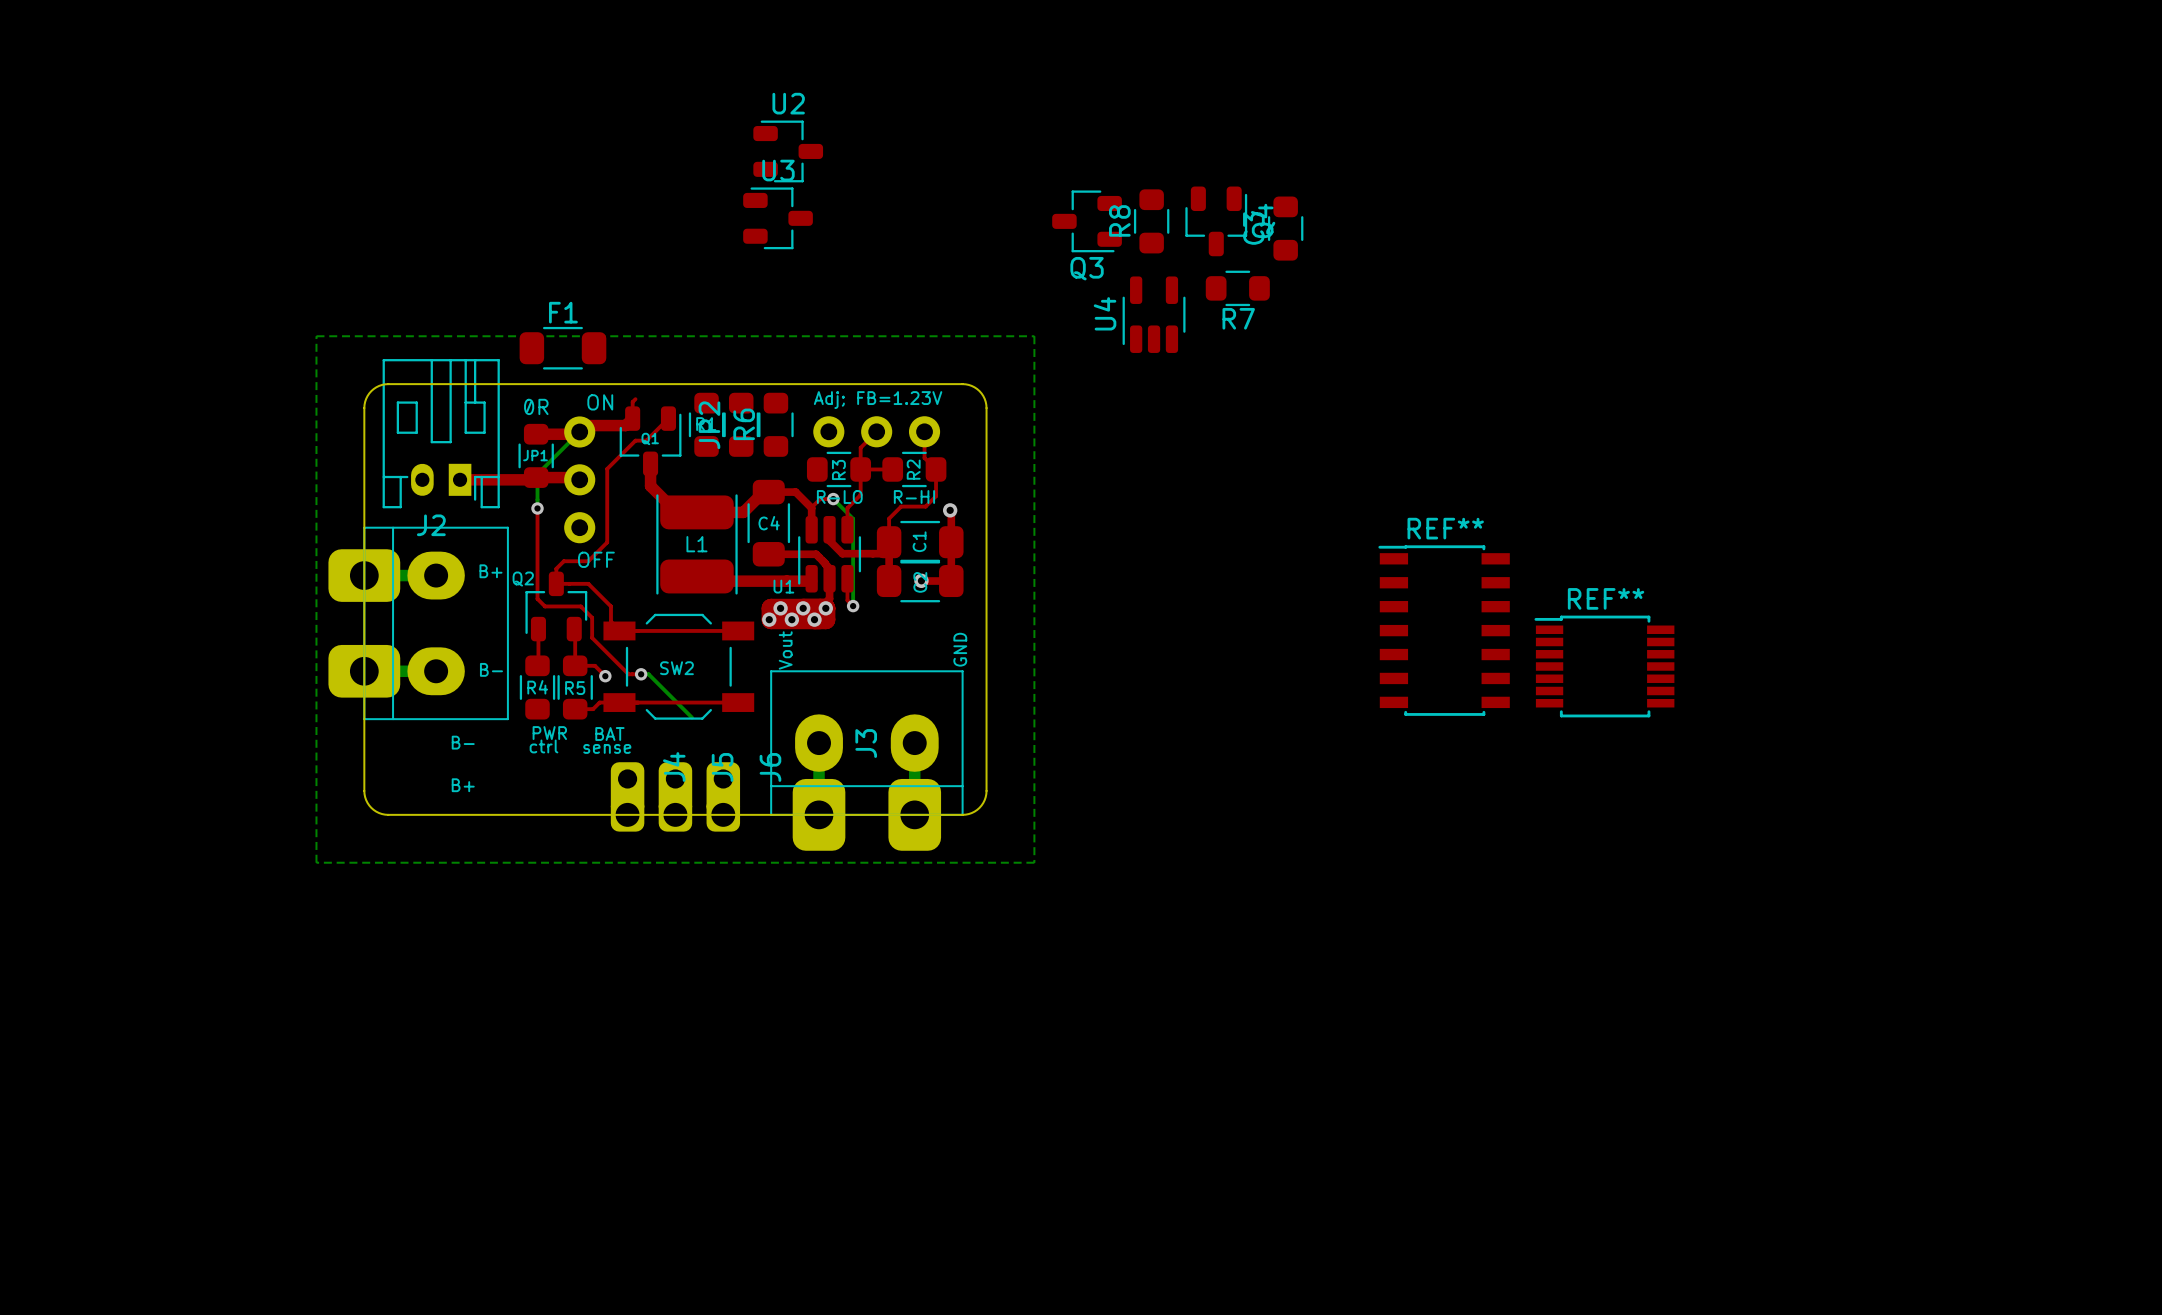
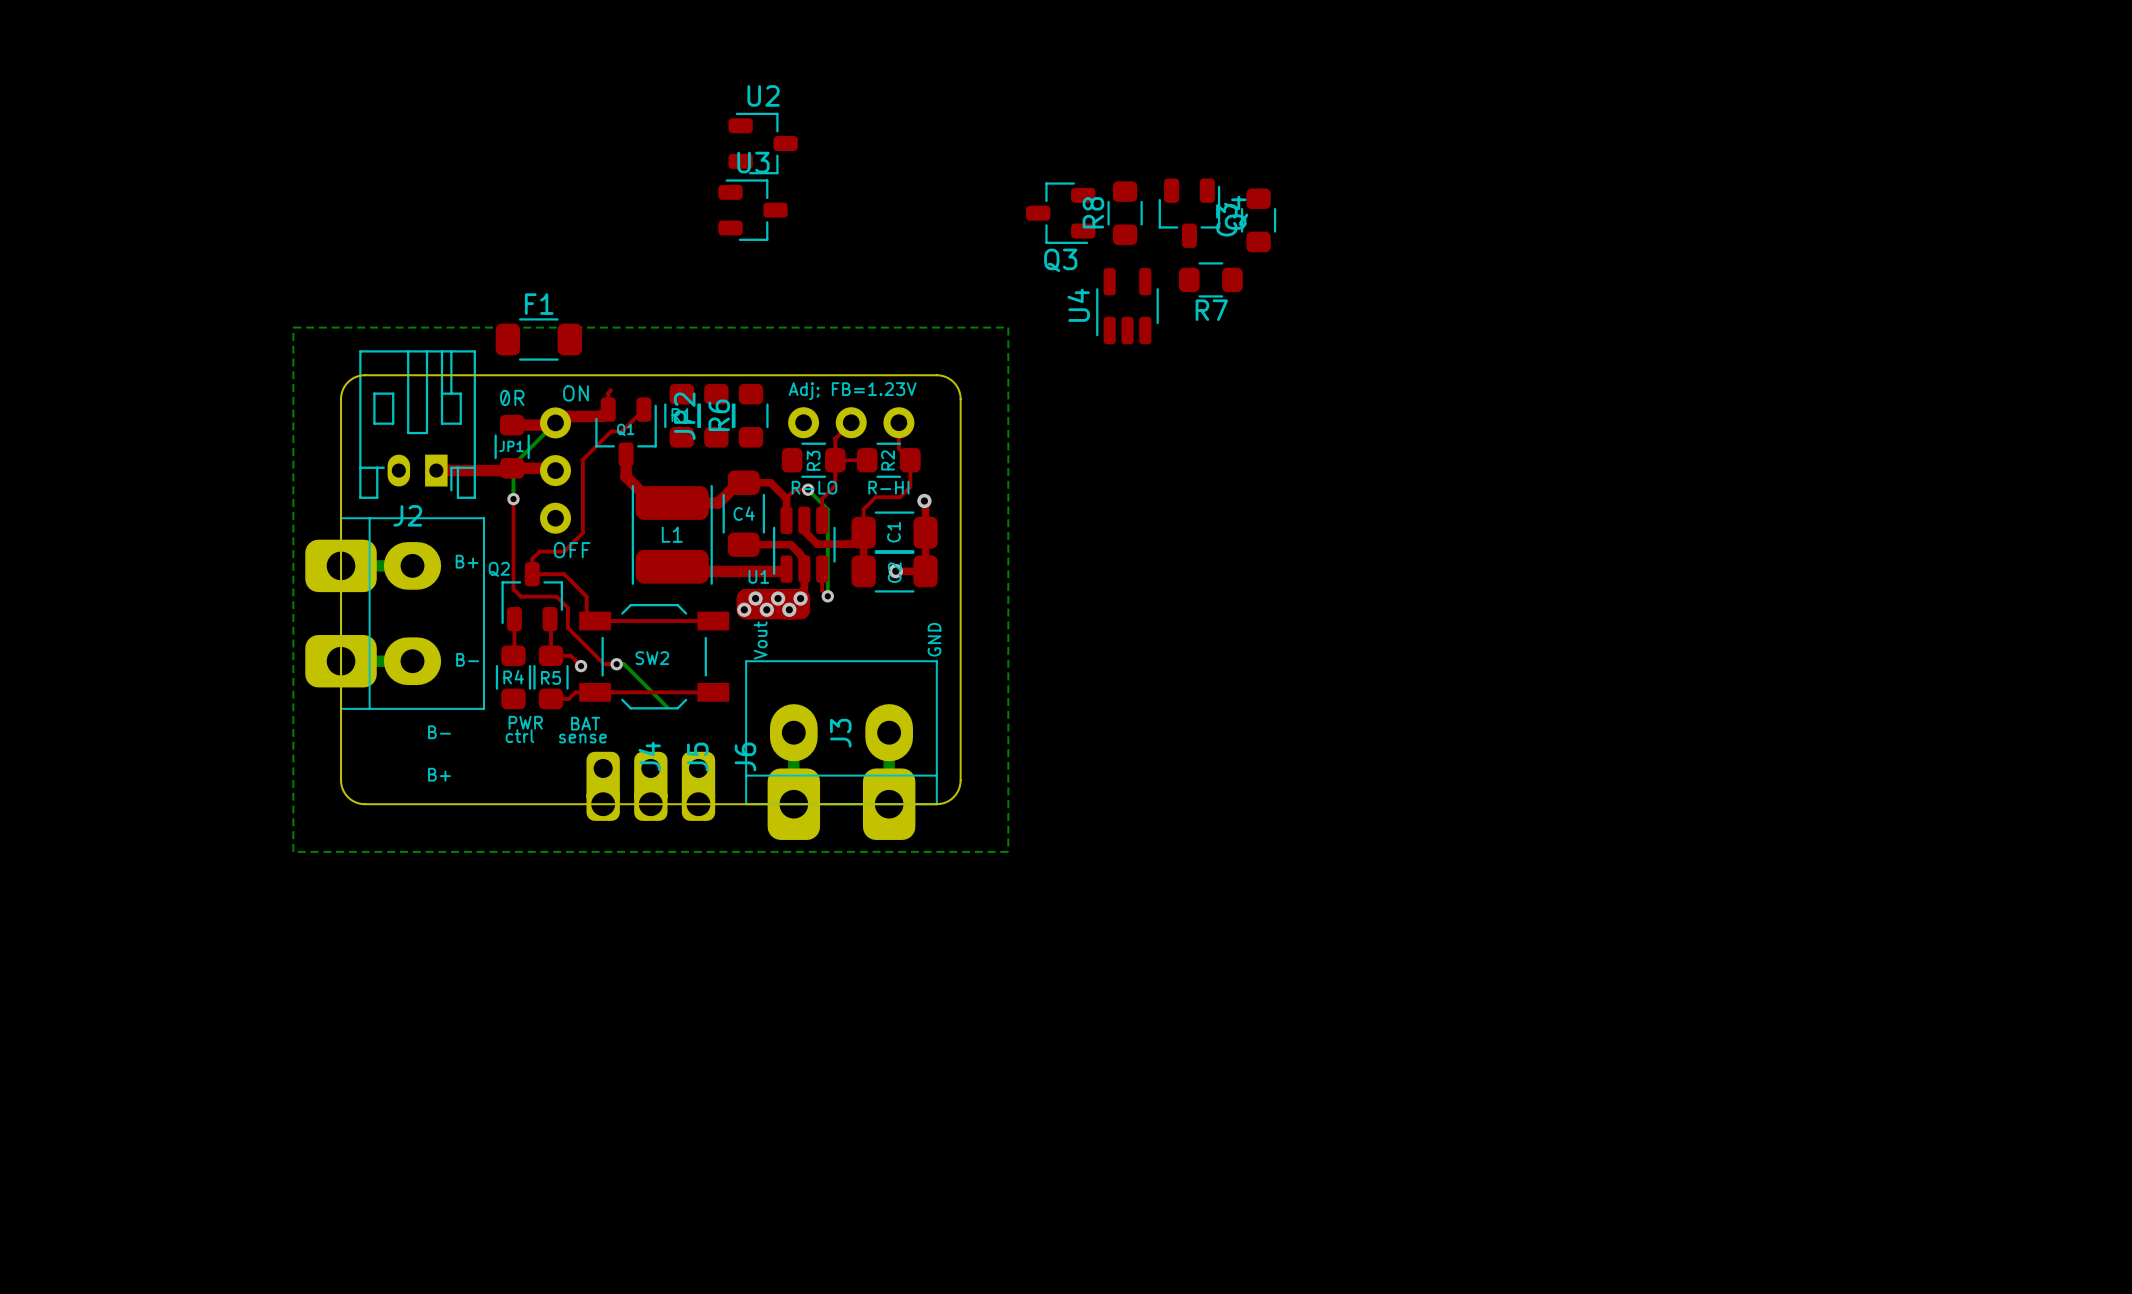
REF**: (1444, 630) -> none
REF**: (1604, 666) -> none

